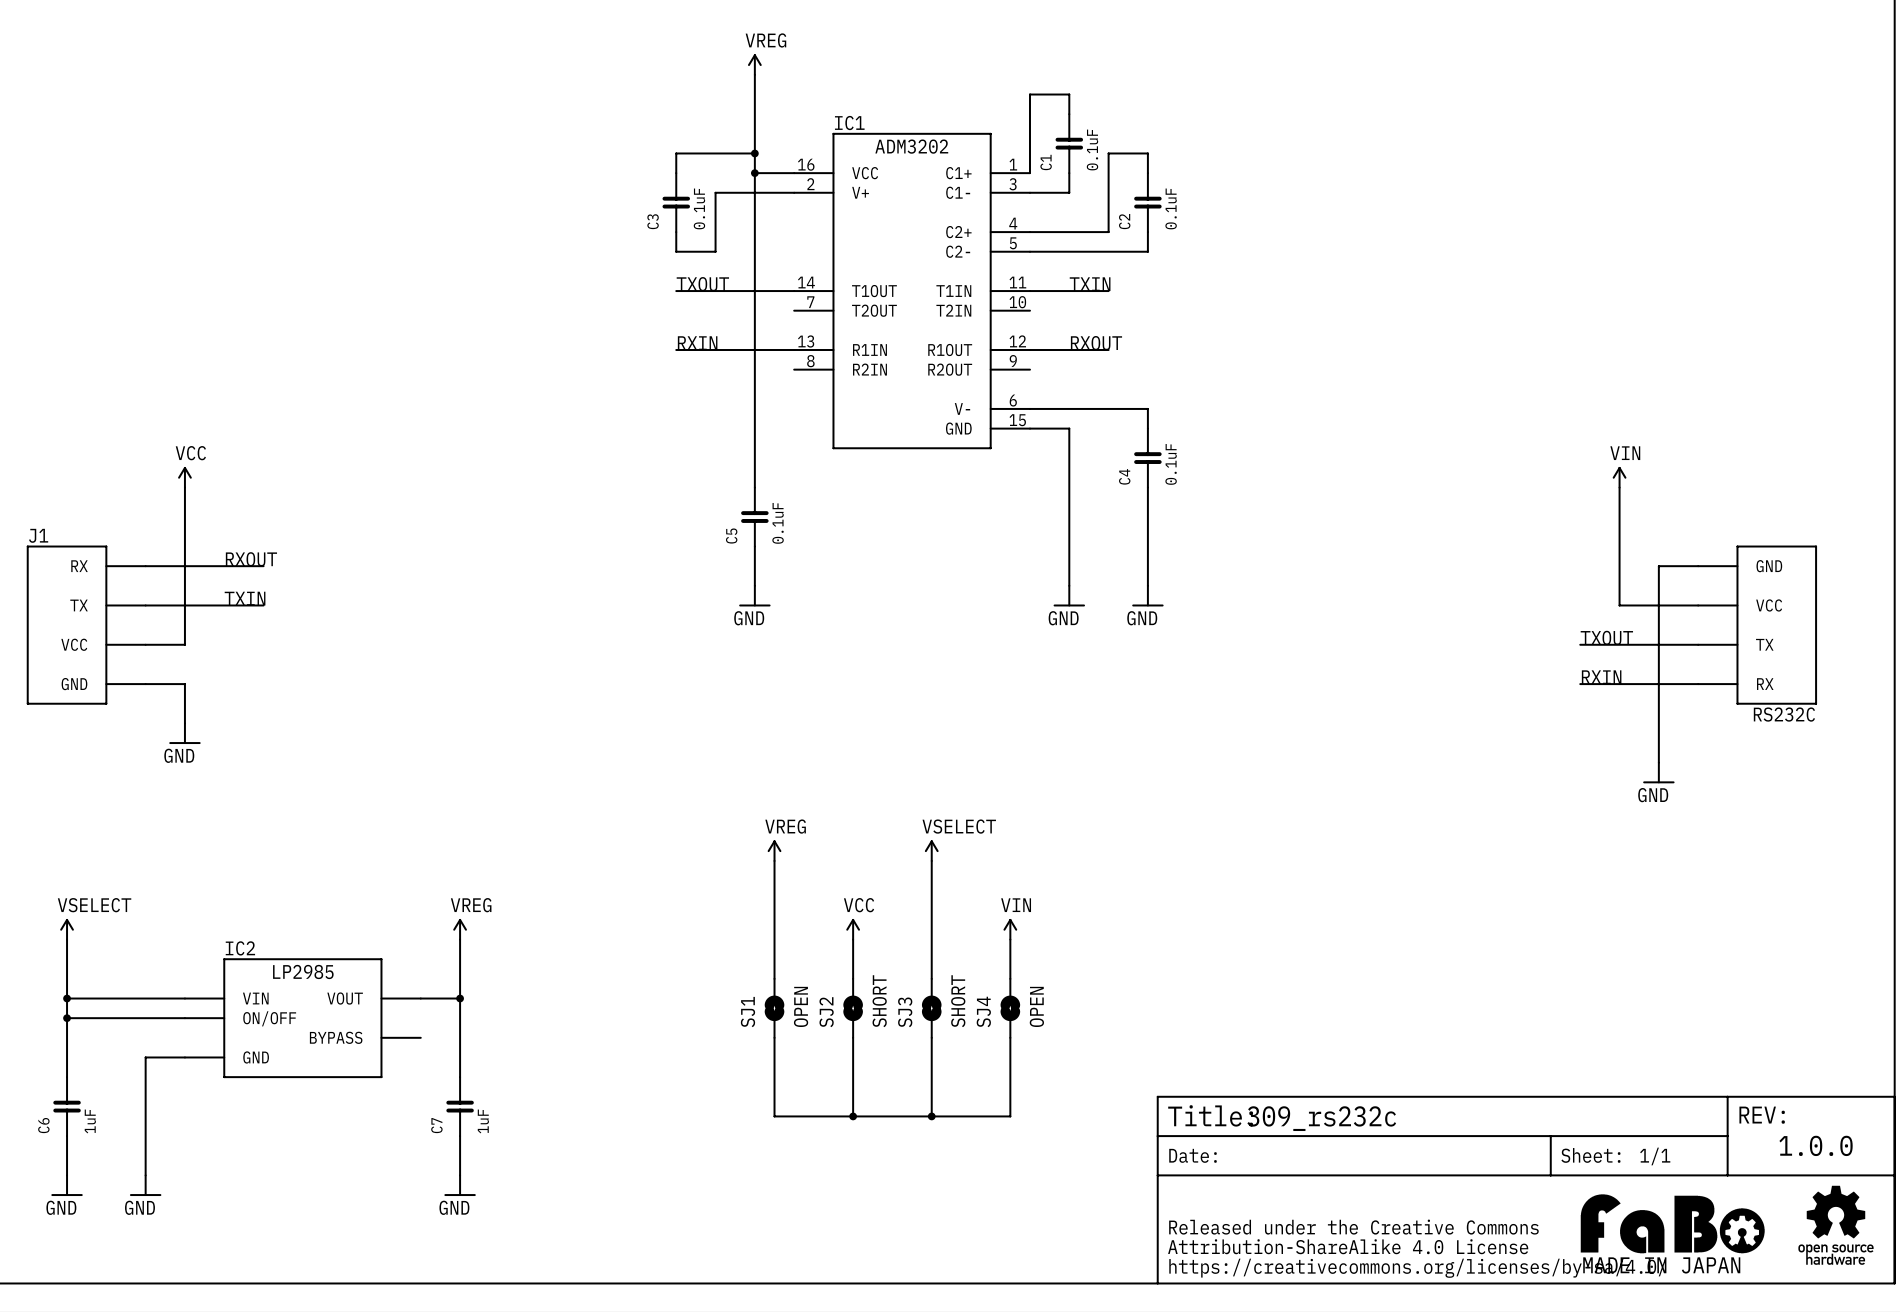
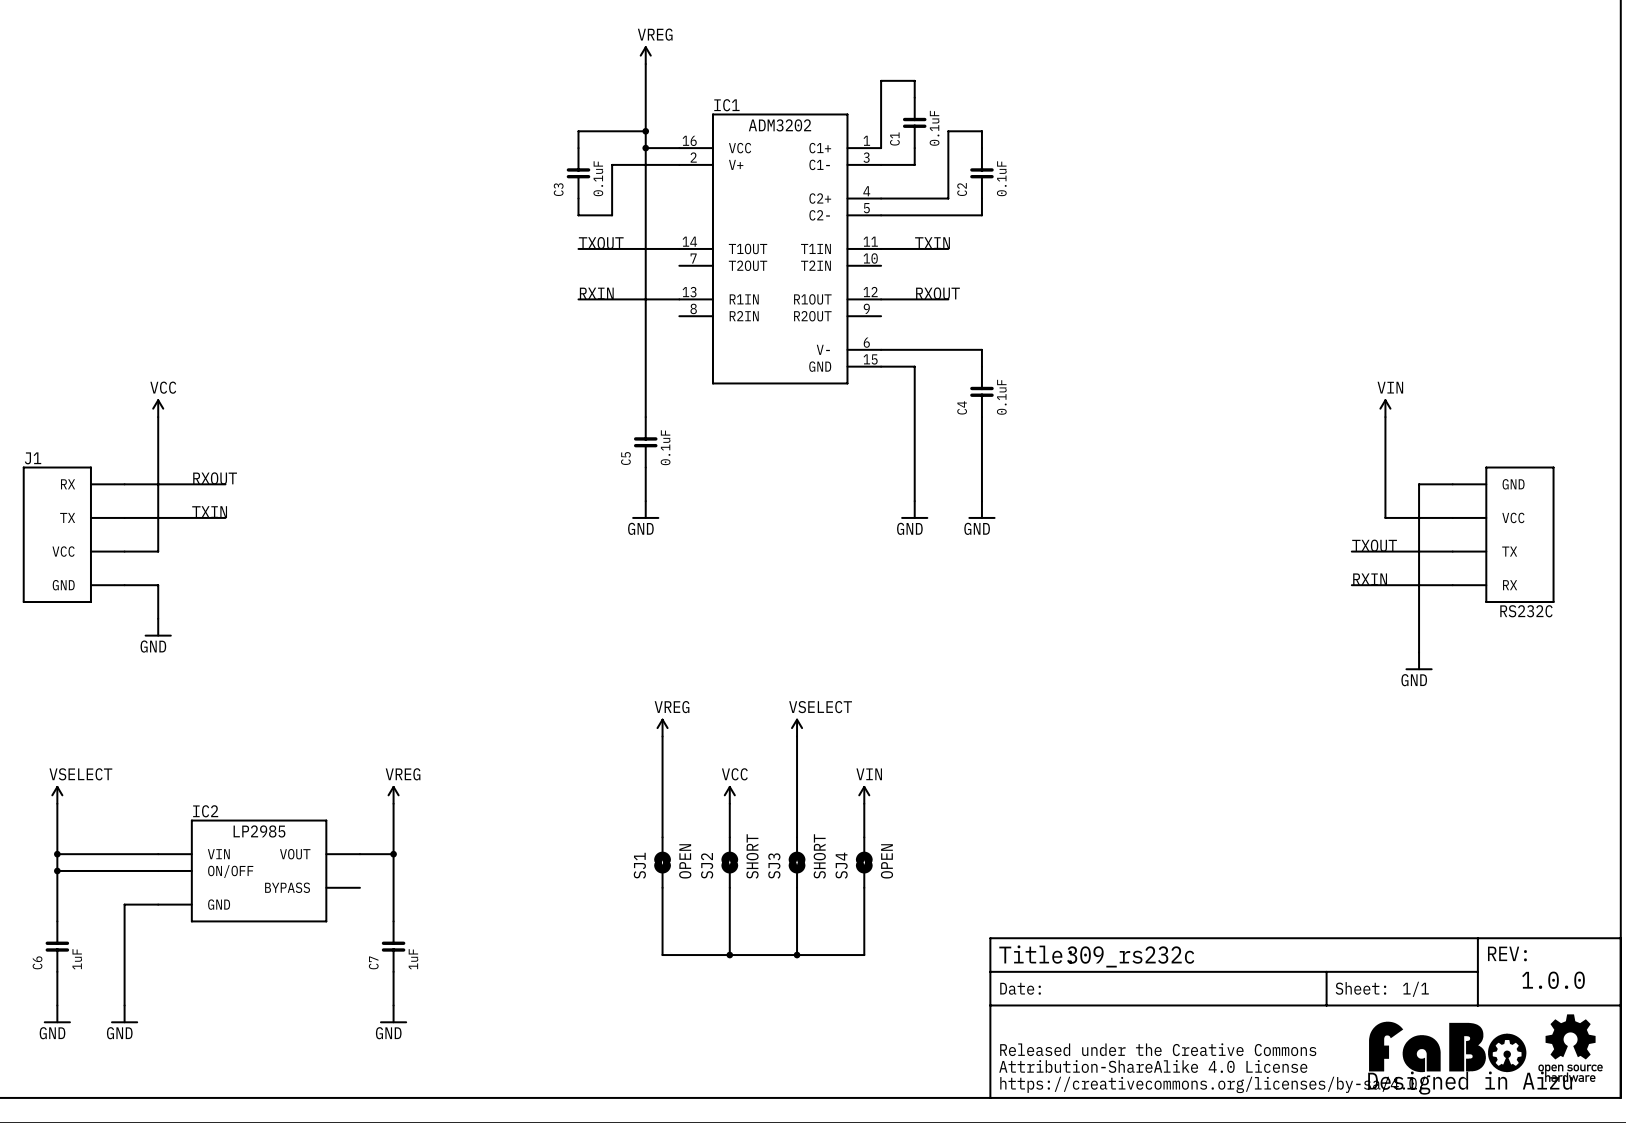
part: (1672, 1223) -> none
part: none -> (1447, 1046)

